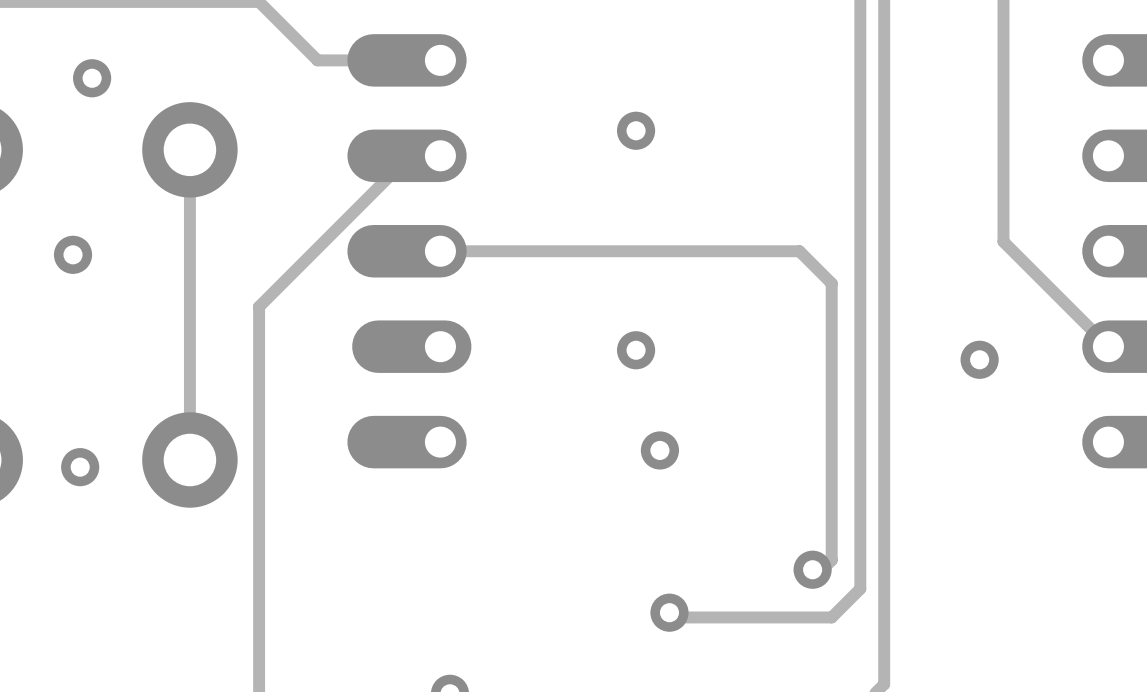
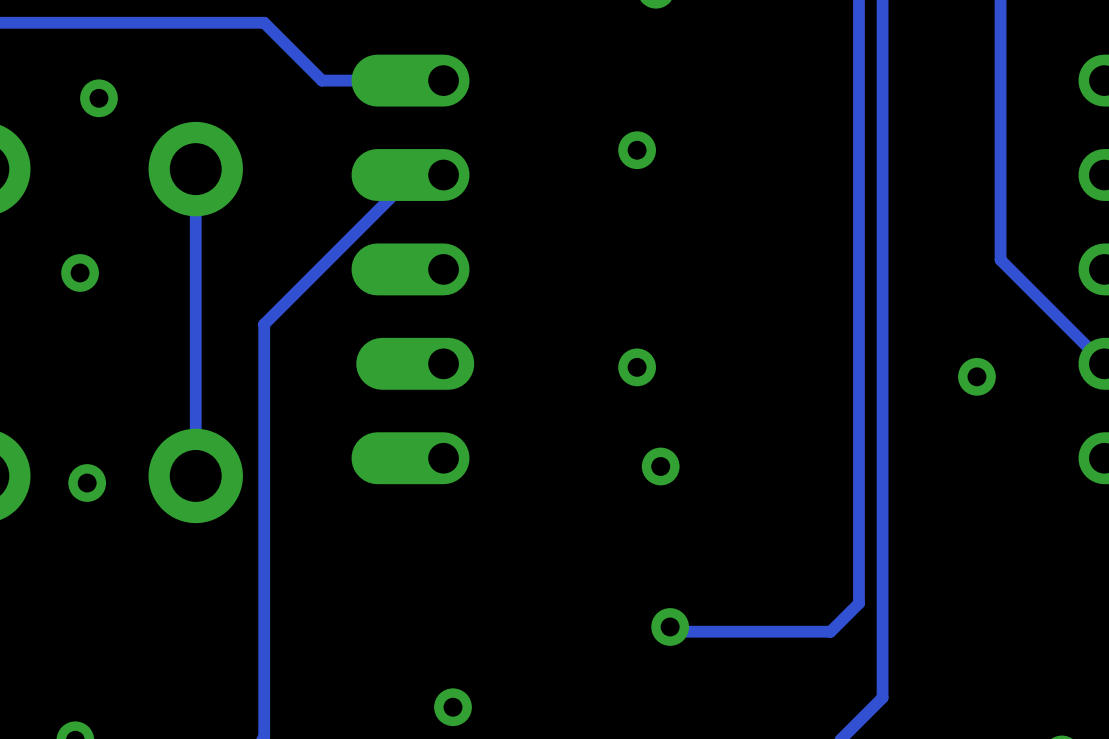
track: (440, 251) (799, 251) (831, 283) (831, 560) (822, 569) (812, 569) -> none
via: (812, 569) -> none

